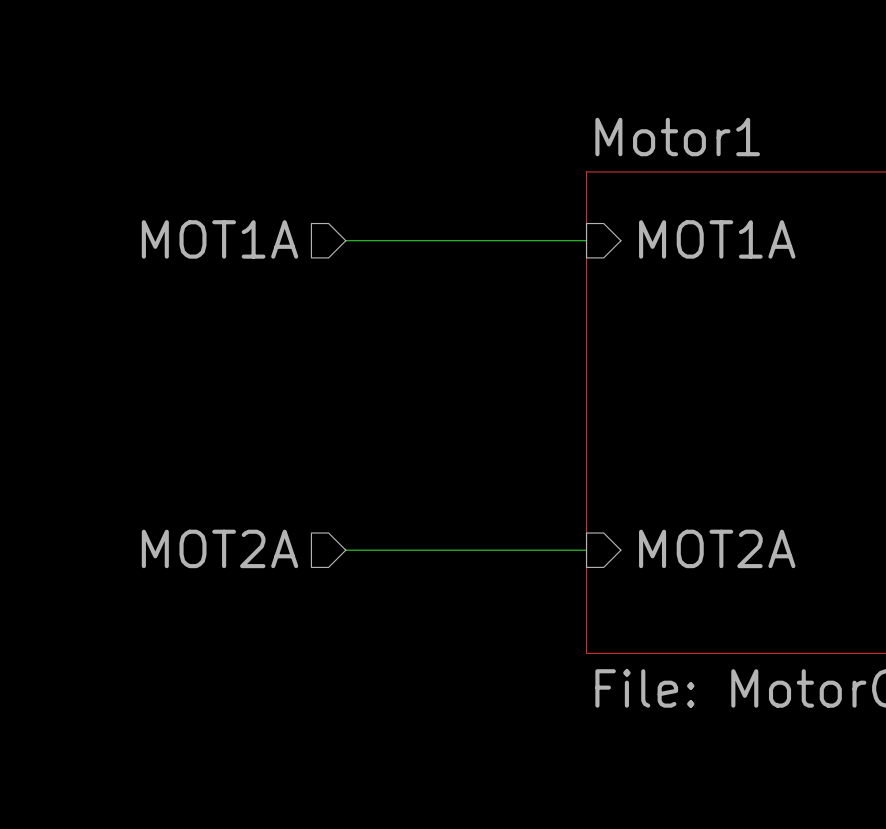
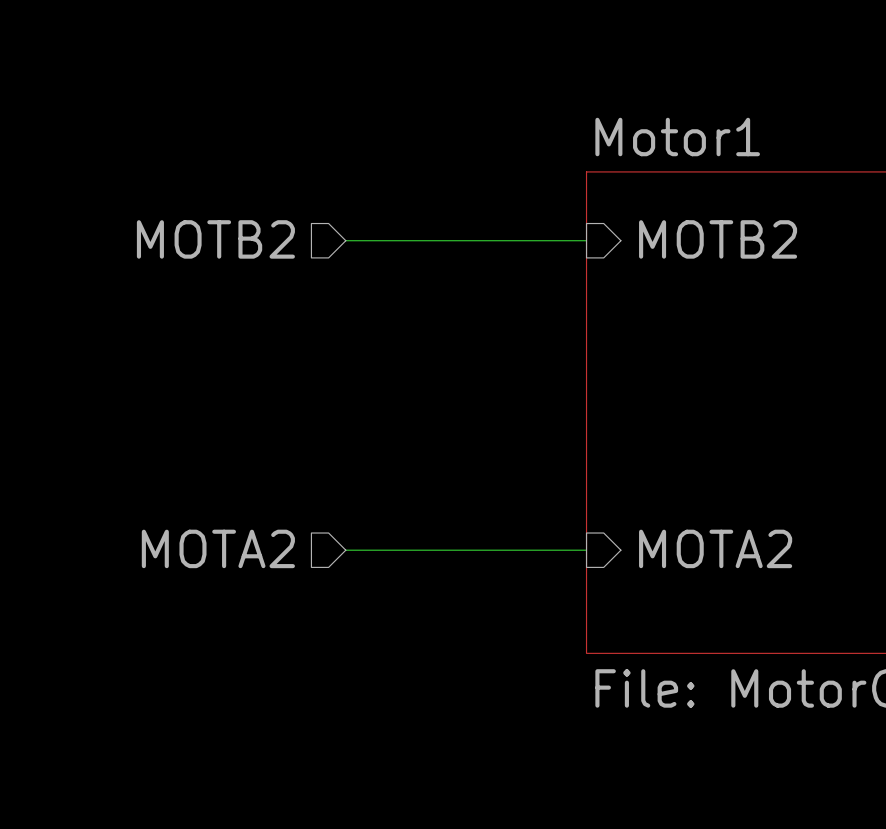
hierarchical label: MOT1A (220, 239) -> MOTB2 (215, 239)
sheet pin: MOT1A (717, 239) -> MOTB2 (718, 239)
hierarchical label: MOT2A (220, 548) -> MOTA2 (218, 548)
sheet pin: MOT2A (717, 548) -> MOTA2 (715, 548)

